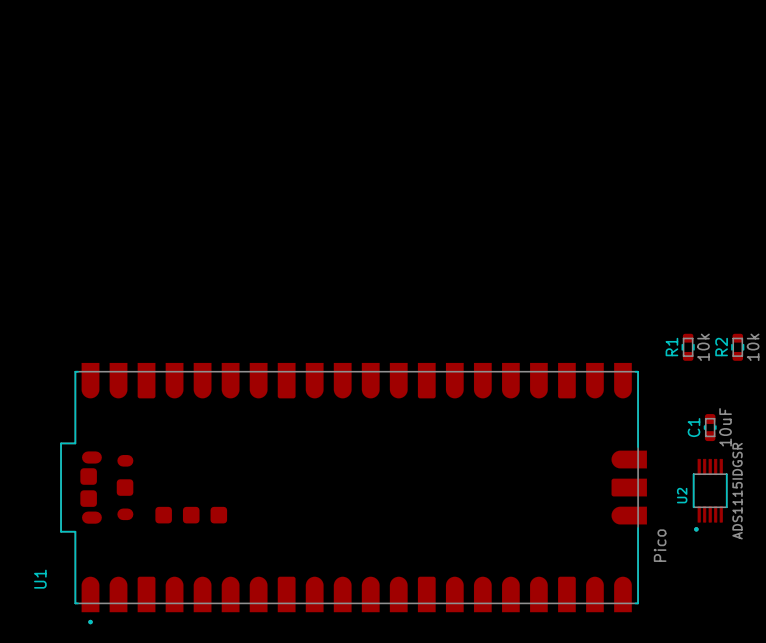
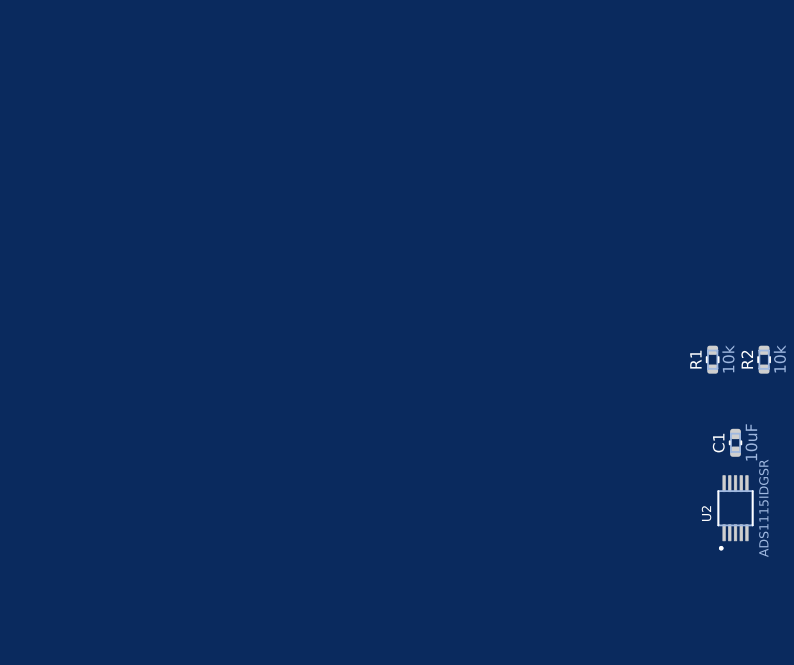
U1: Pico (353, 493) -> none

